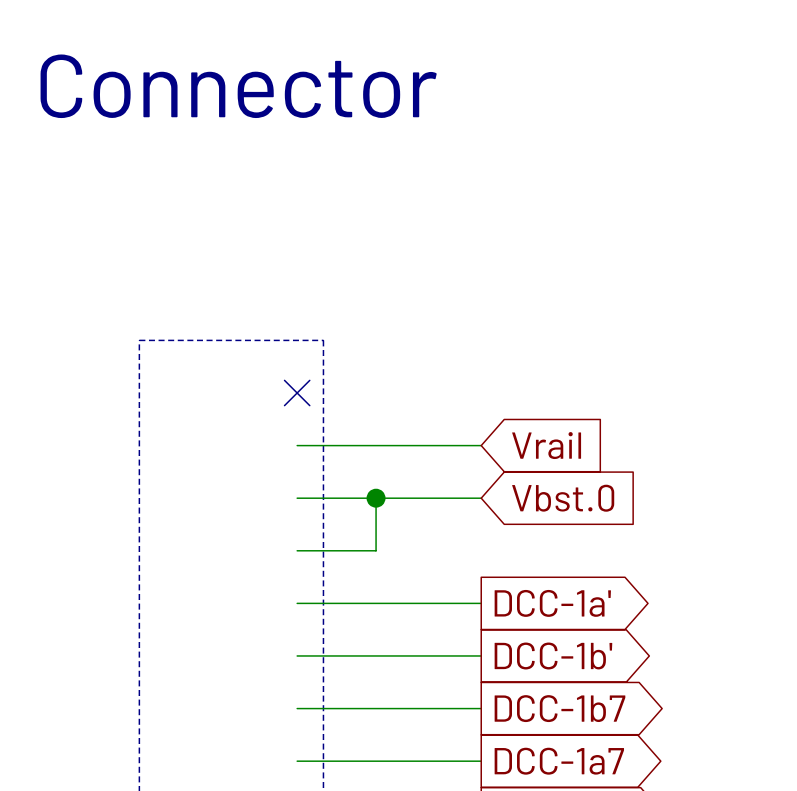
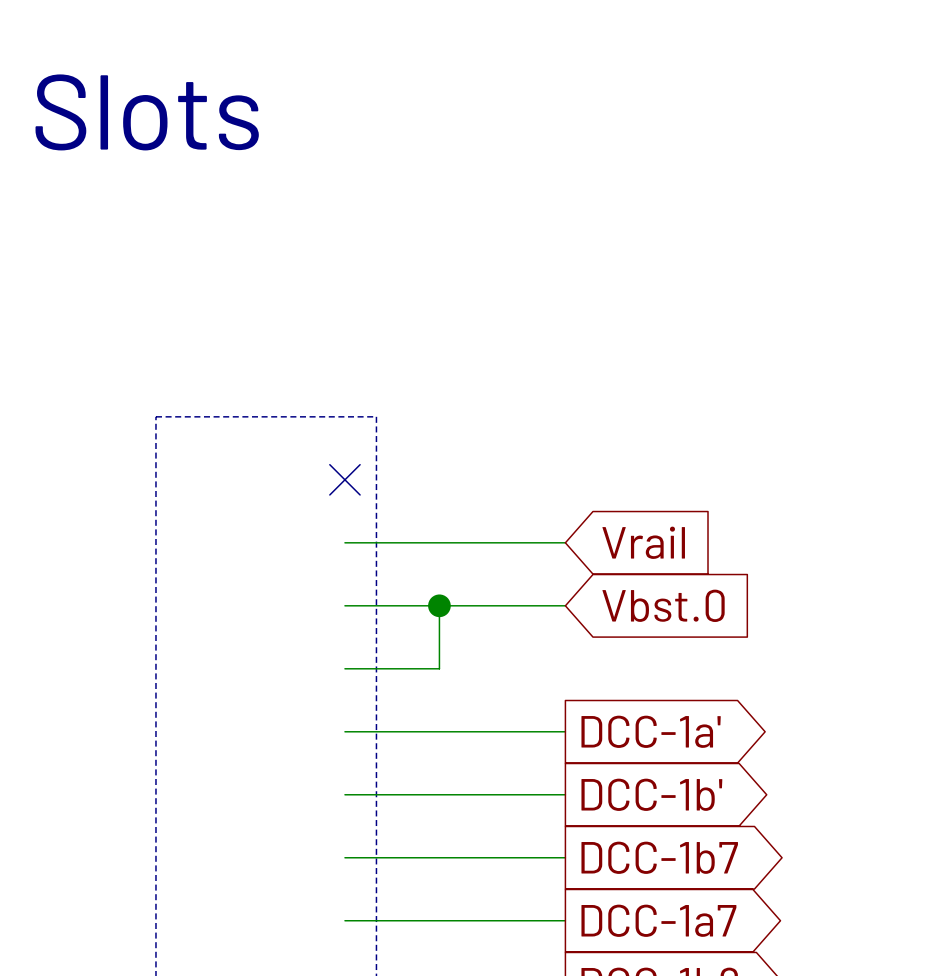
text: Connector (238, 86) -> Slots (147, 112)

